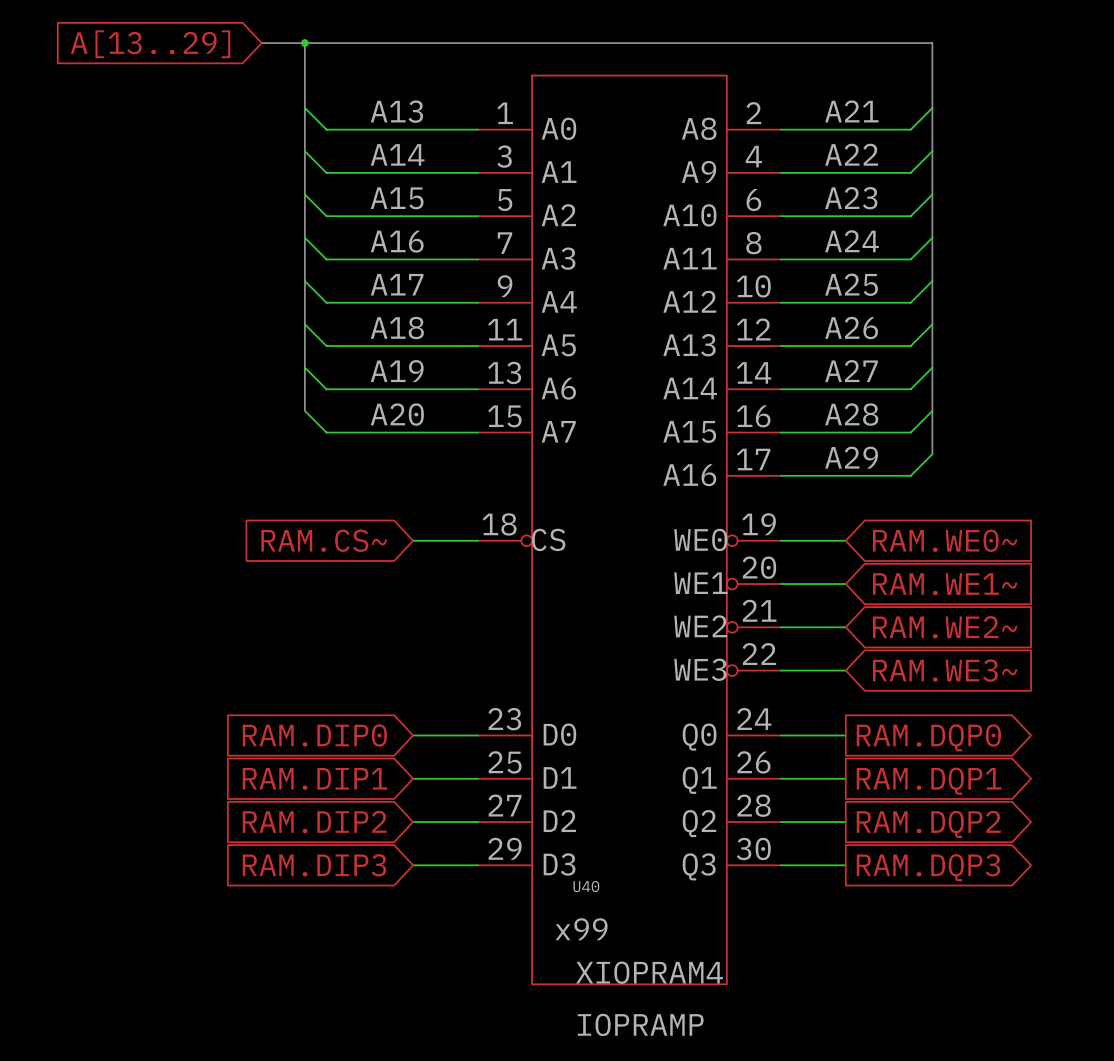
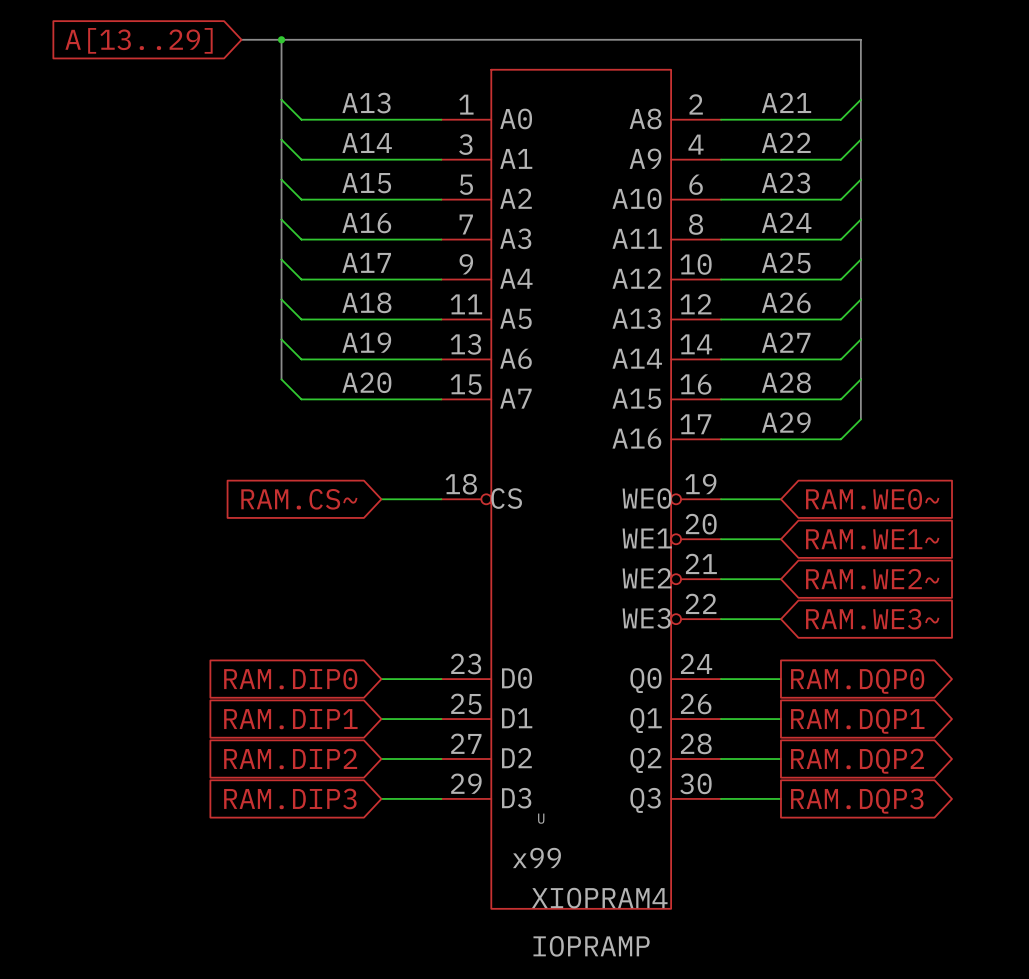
U40 name: U40 (586, 886) -> U (541, 818)

